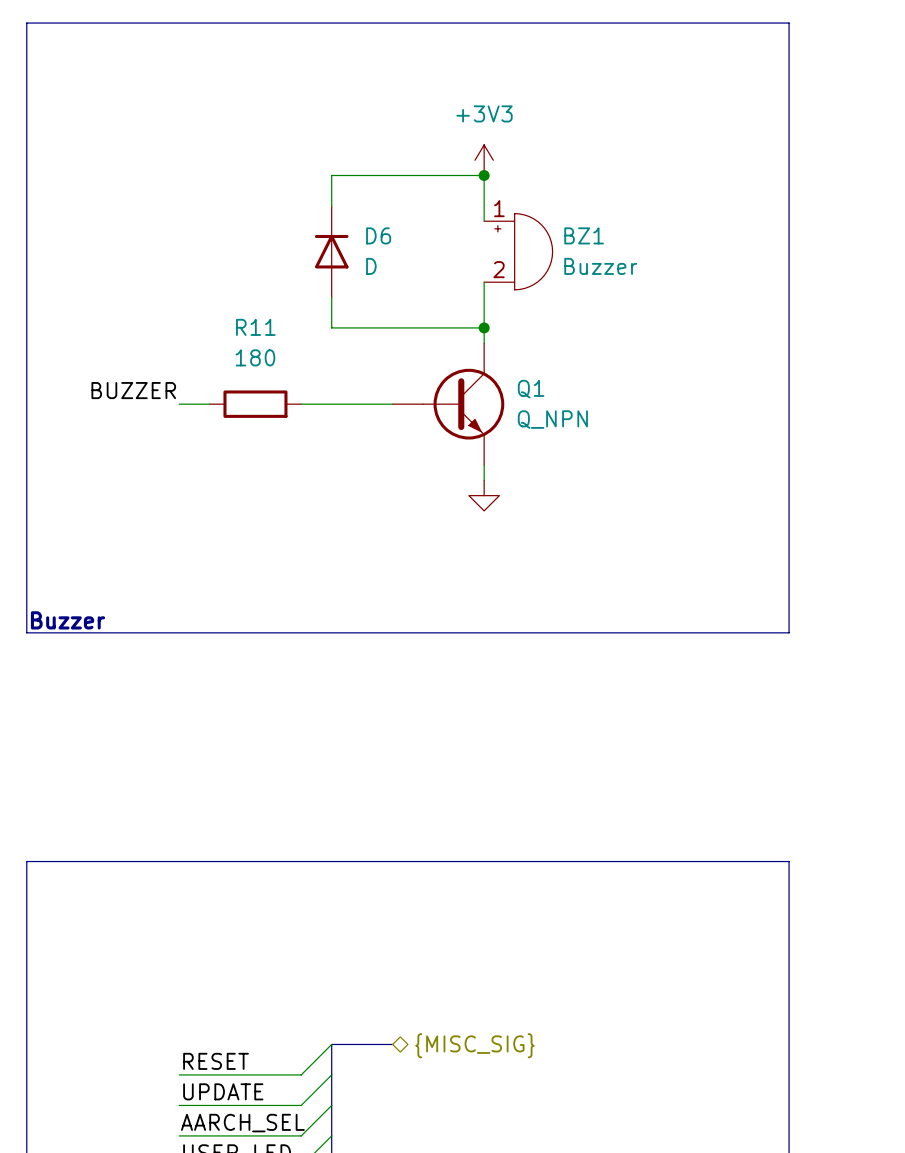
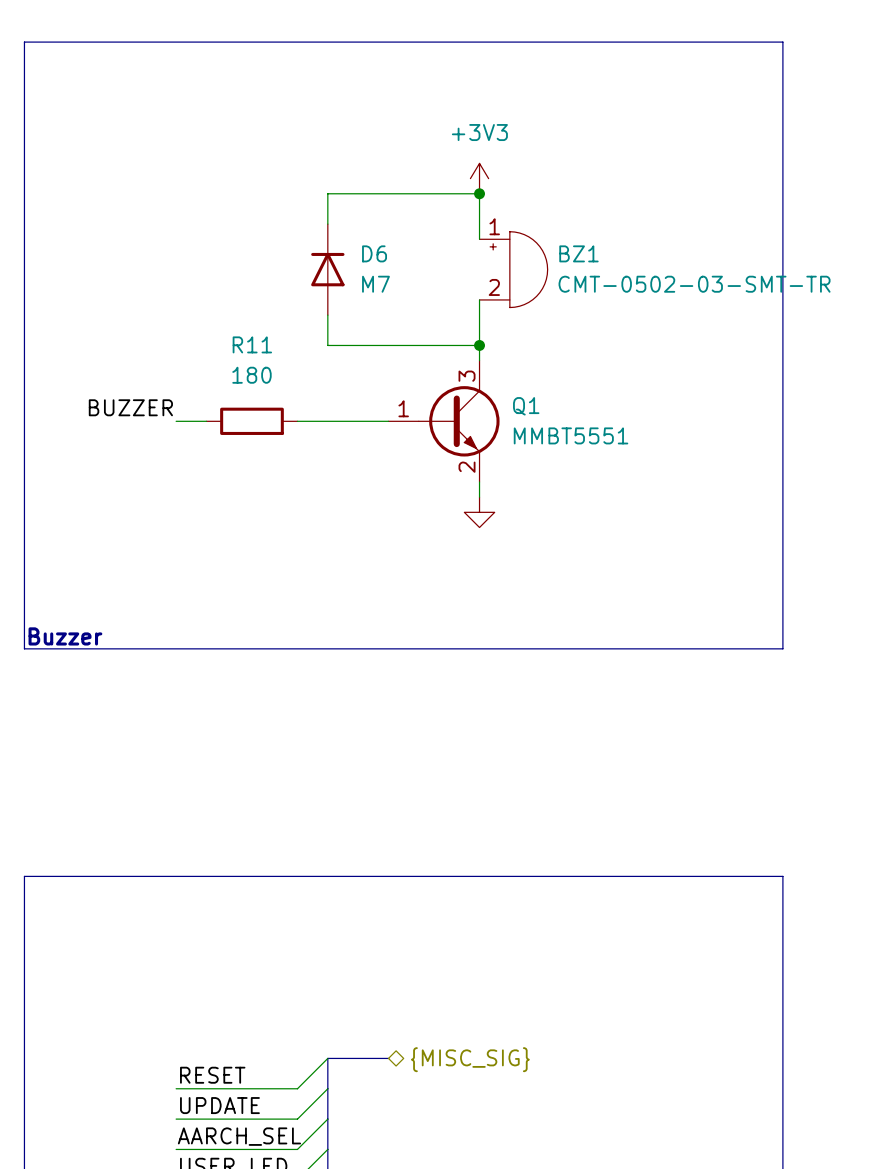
D6 value: D (371, 266) -> M7 (375, 284)
BZ1 value: Buzzer (600, 266) -> CMT-0502-03-SMT-TR (694, 284)
Q1 pin number: none -> 3 (467, 376)
Q1 pin number: none -> 1 (403, 408)
Q1 value: Q_NPN (552, 419) -> MMBT5551 (571, 435)
Q1 pin number: none -> 2 (467, 467)

